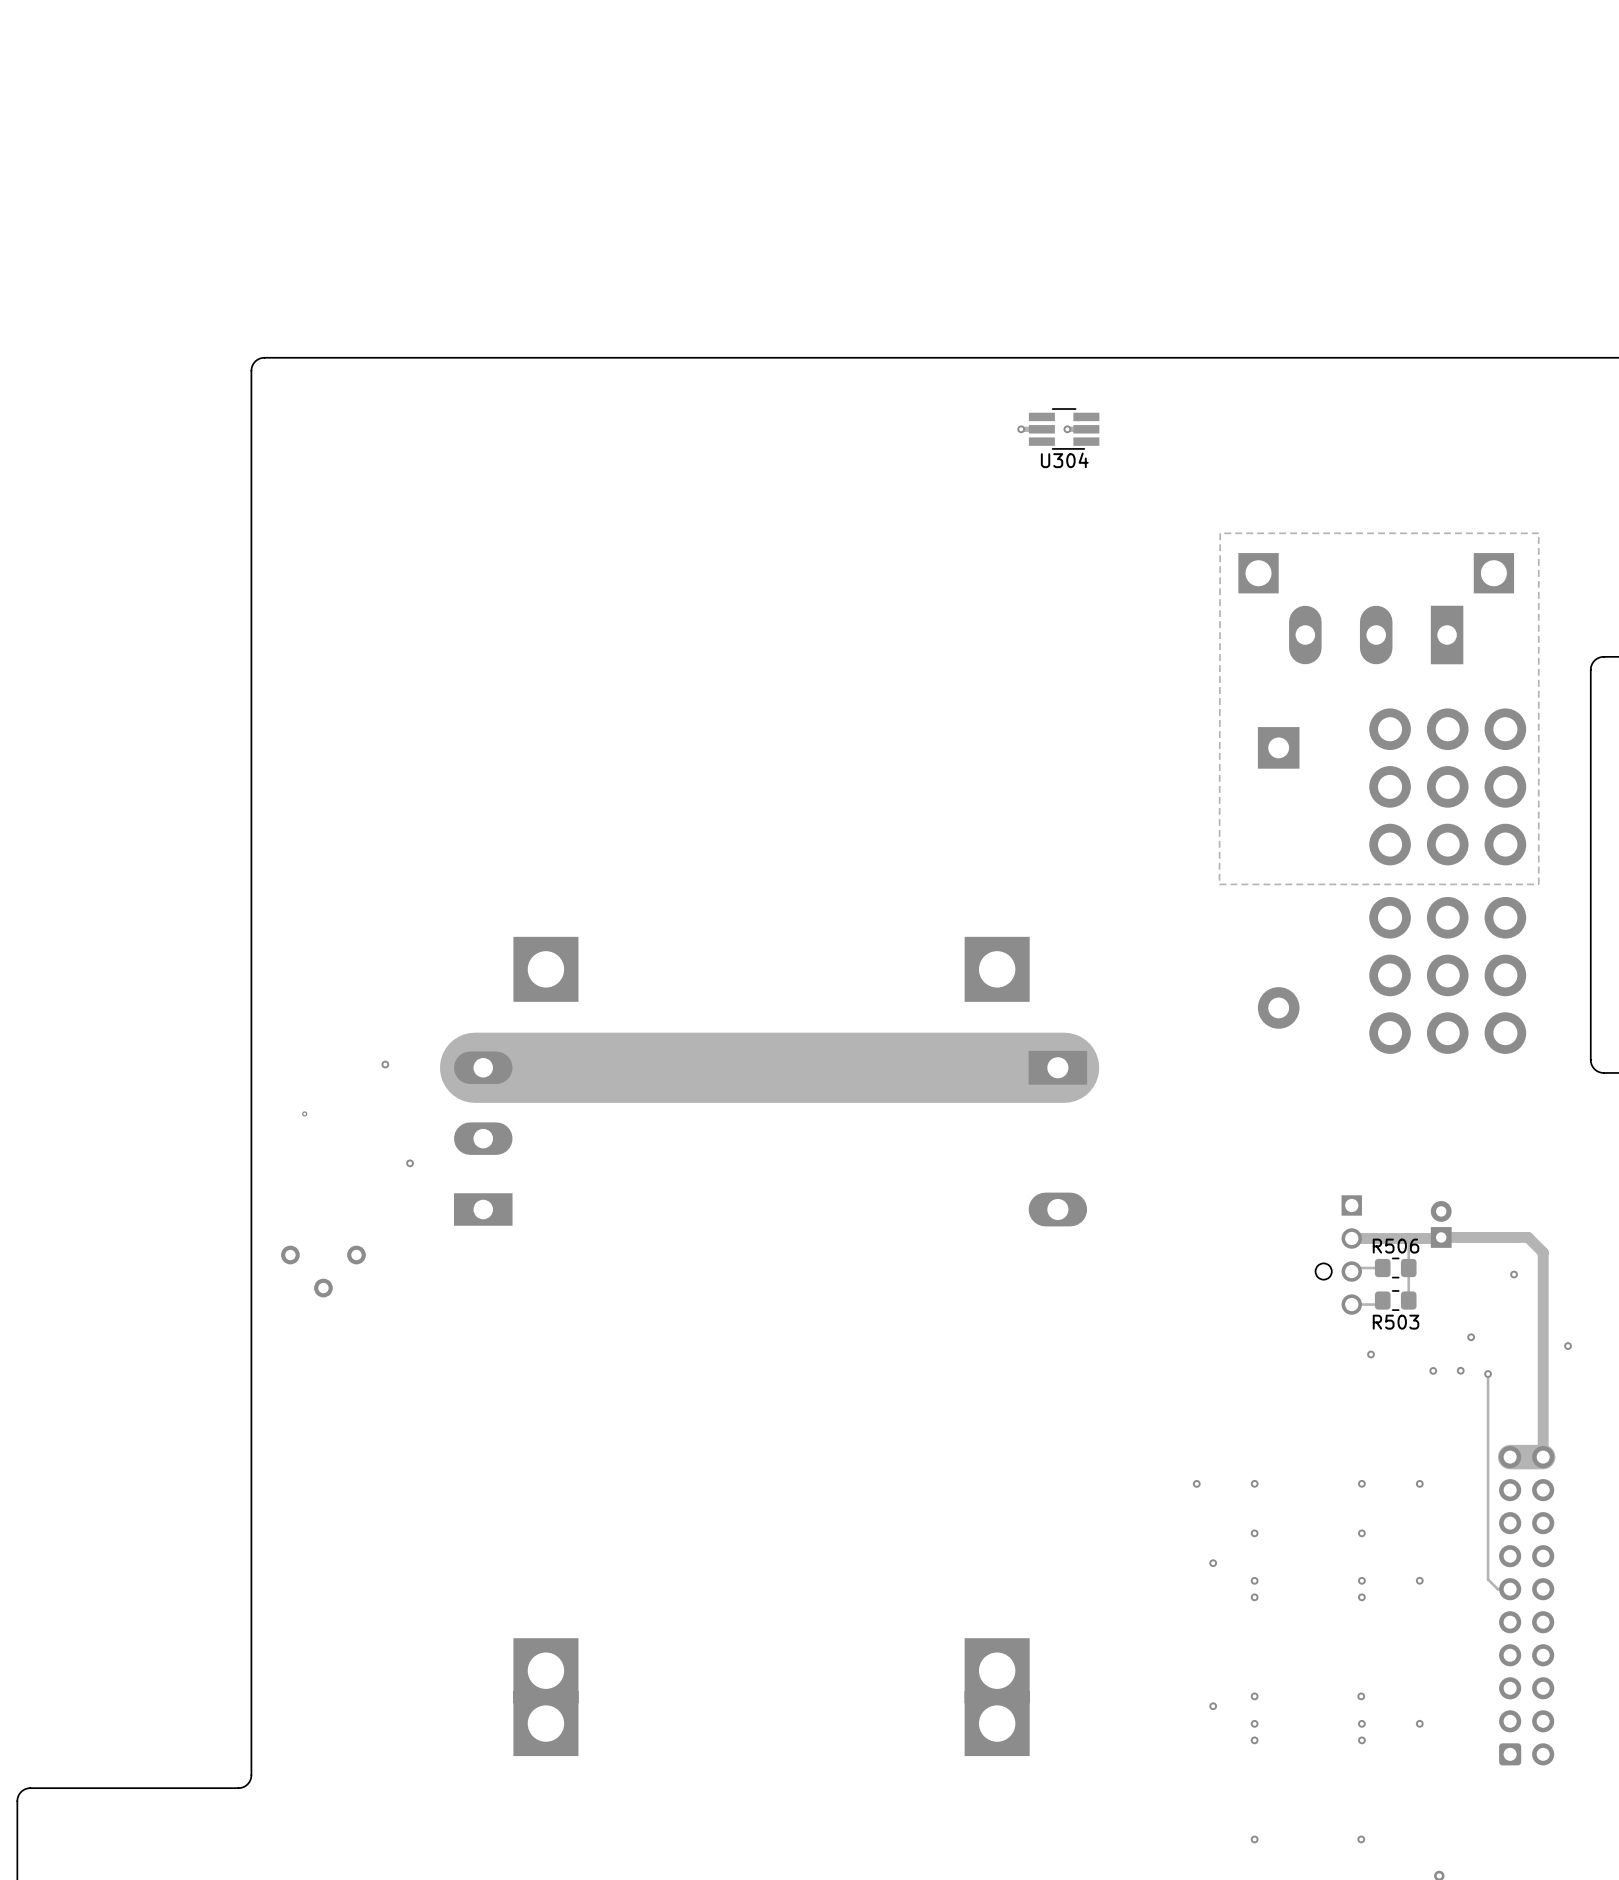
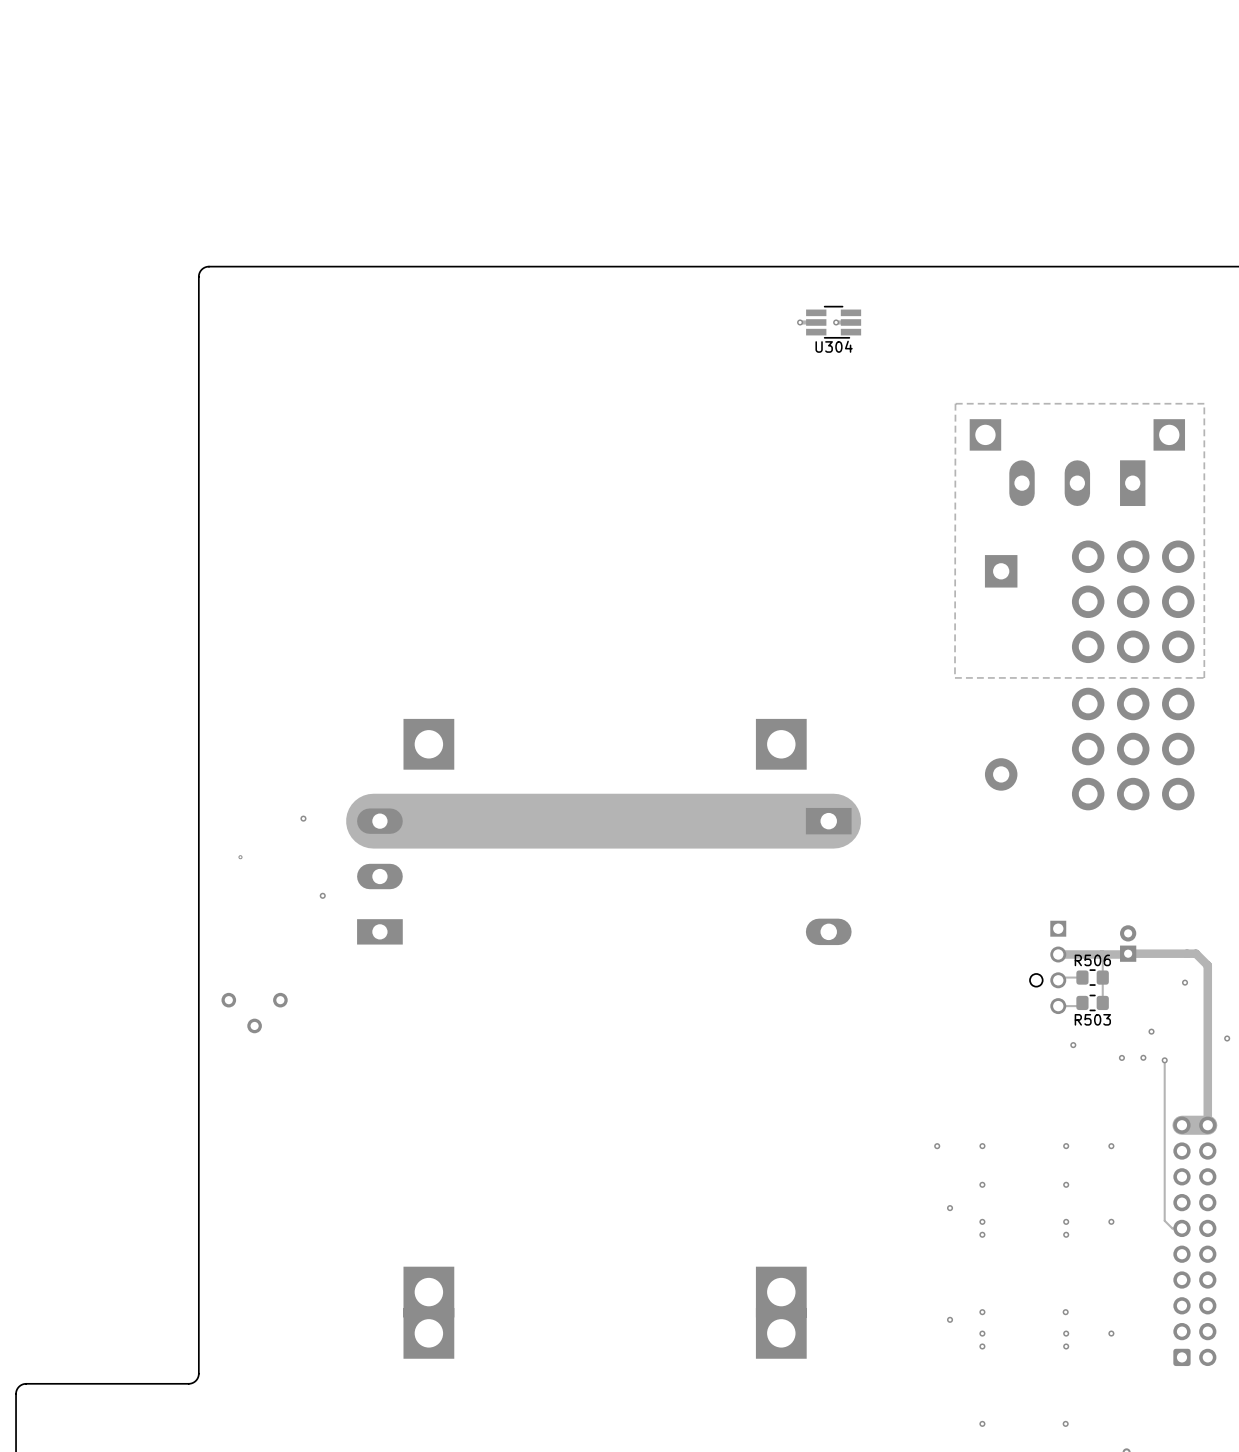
part position: (323, 1271) -> (254, 1013)

